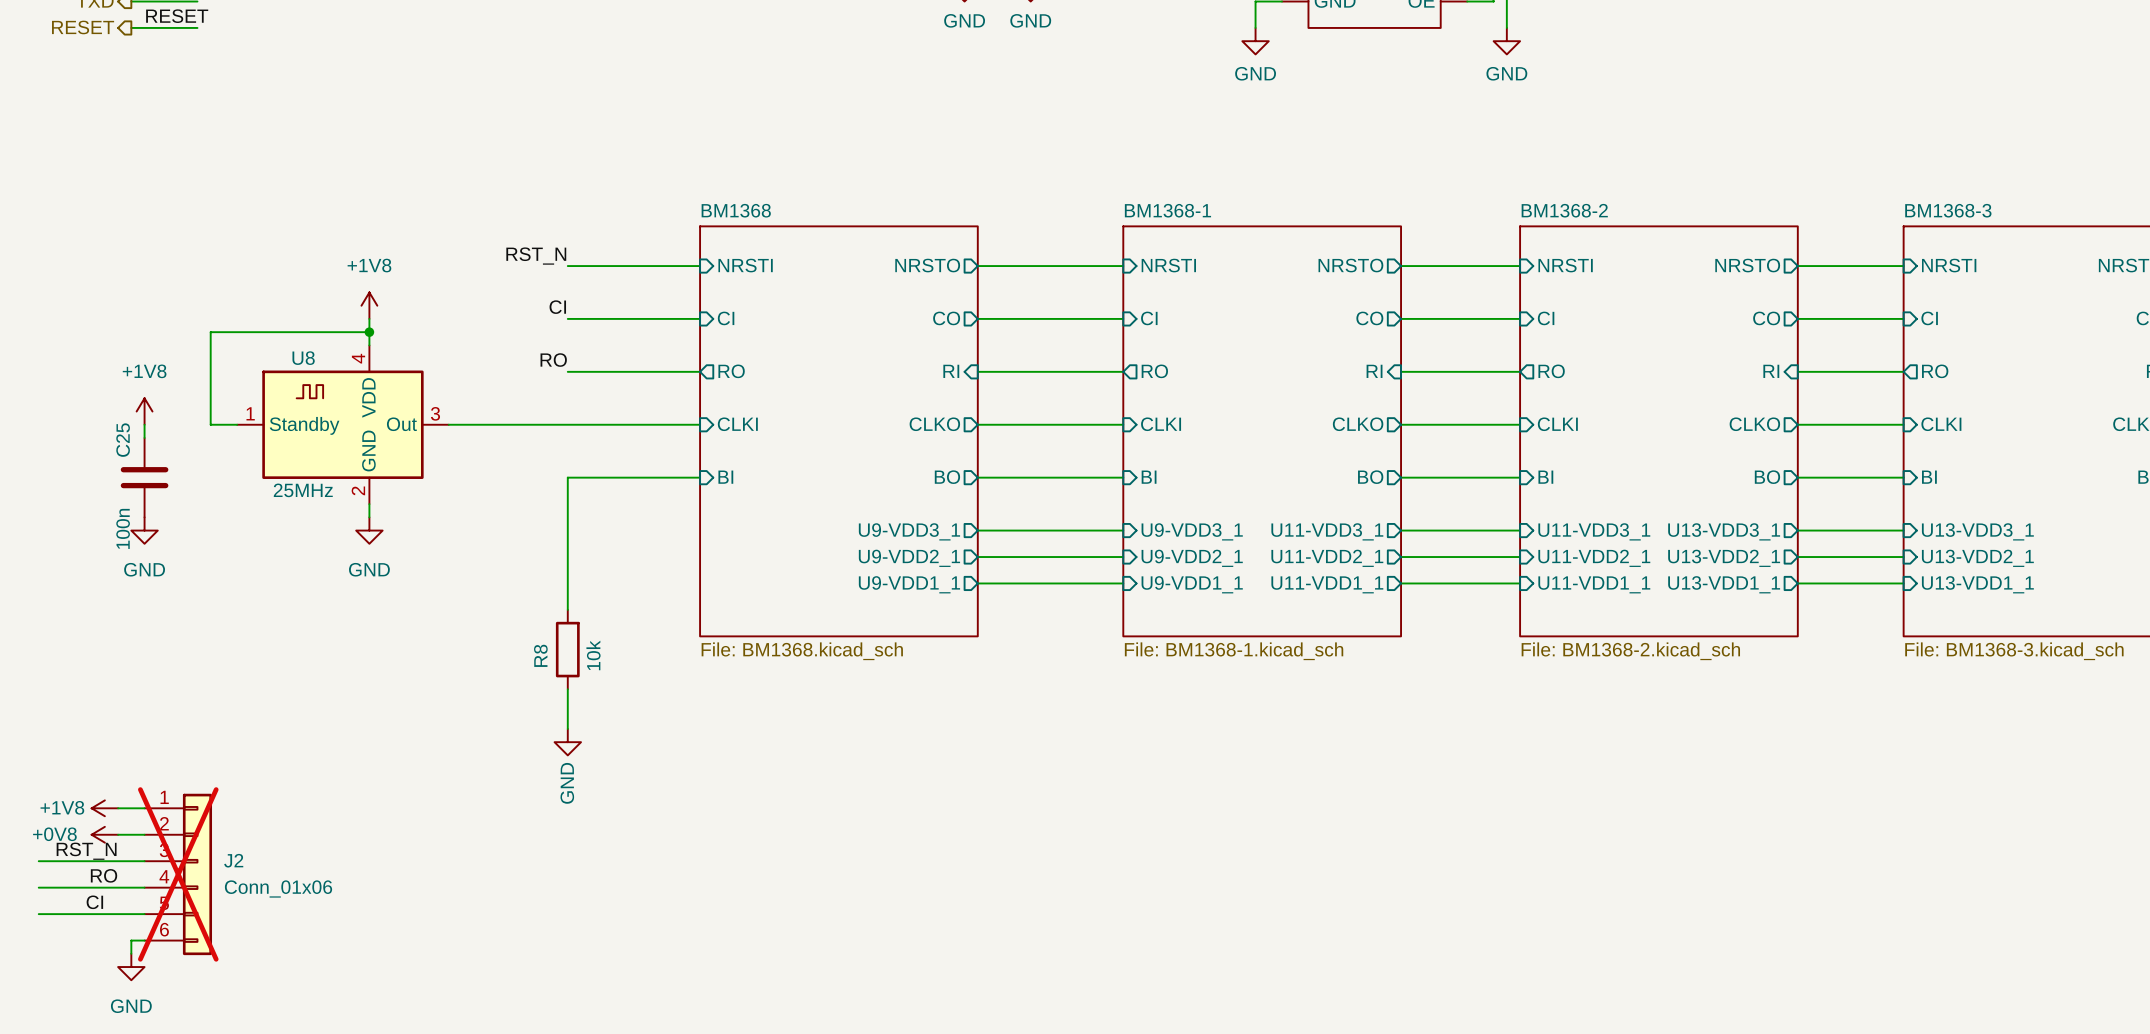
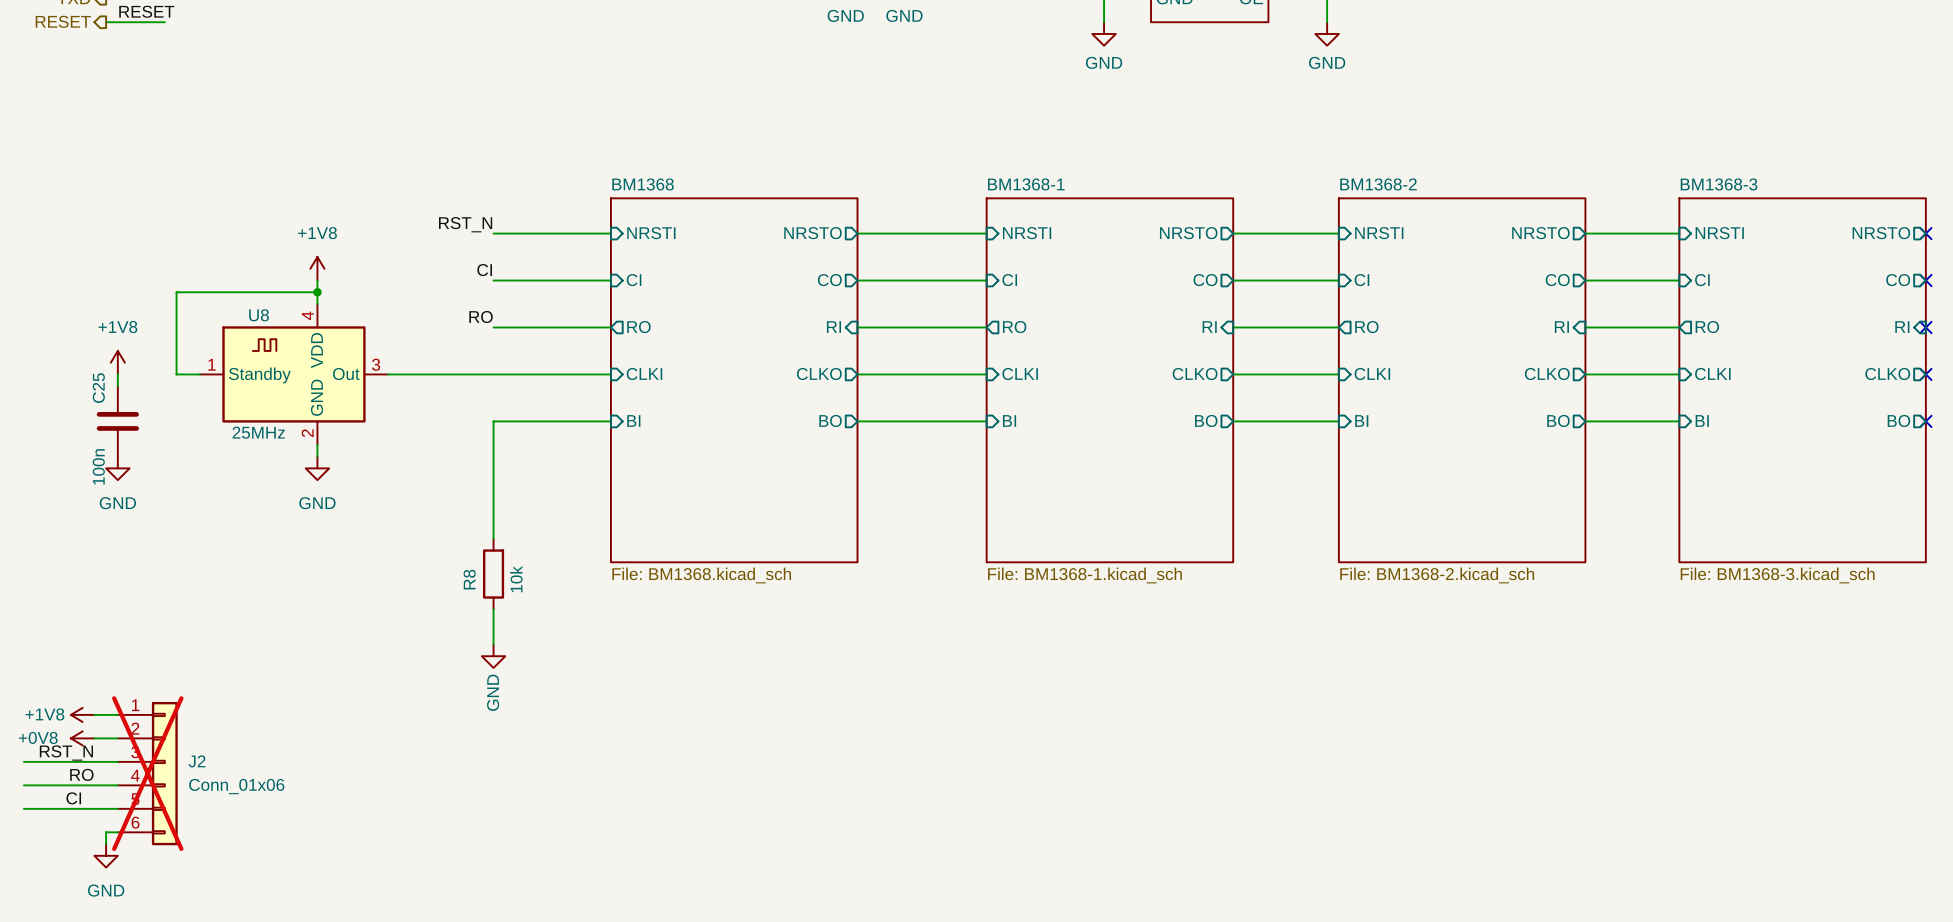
wire: (977, 530) (1123, 530) -> none
wire: (1401, 530) (1520, 530) -> none
wire: (1797, 530) (1903, 530) -> none
sheet pin: U9-VDD3_1 (909, 531) -> none
sheet pin: U9-VDD3_1 (1192, 531) -> none
sheet pin: U11-VDD3_1 (1327, 531) -> none
sheet pin: U11-VDD3_1 (1594, 531) -> none
sheet pin: U13-VDD3_1 (1724, 531) -> none
sheet pin: U13-VDD3_1 (1977, 531) -> none
wire: (977, 557) (1123, 557) -> none
wire: (1401, 557) (1520, 557) -> none
wire: (1797, 557) (1903, 557) -> none
sheet pin: U9-VDD2_1 (909, 558) -> none
sheet pin: U9-VDD2_1 (1192, 558) -> none
sheet pin: U11-VDD2_1 (1327, 558) -> none
sheet pin: U11-VDD2_1 (1594, 558) -> none
sheet pin: U13-VDD2_1 (1724, 558) -> none
sheet pin: U13-VDD2_1 (1977, 558) -> none
wire: (977, 583) (1123, 583) -> none
wire: (1401, 583) (1520, 583) -> none
wire: (1797, 583) (1903, 583) -> none
sheet pin: U9-VDD1_1 (909, 584) -> none
sheet pin: U9-VDD1_1 (1192, 584) -> none
sheet pin: U11-VDD1_1 (1327, 584) -> none
sheet pin: U11-VDD1_1 (1594, 584) -> none
sheet pin: U13-VDD1_1 (1724, 584) -> none
sheet pin: U13-VDD1_1 (1977, 584) -> none

